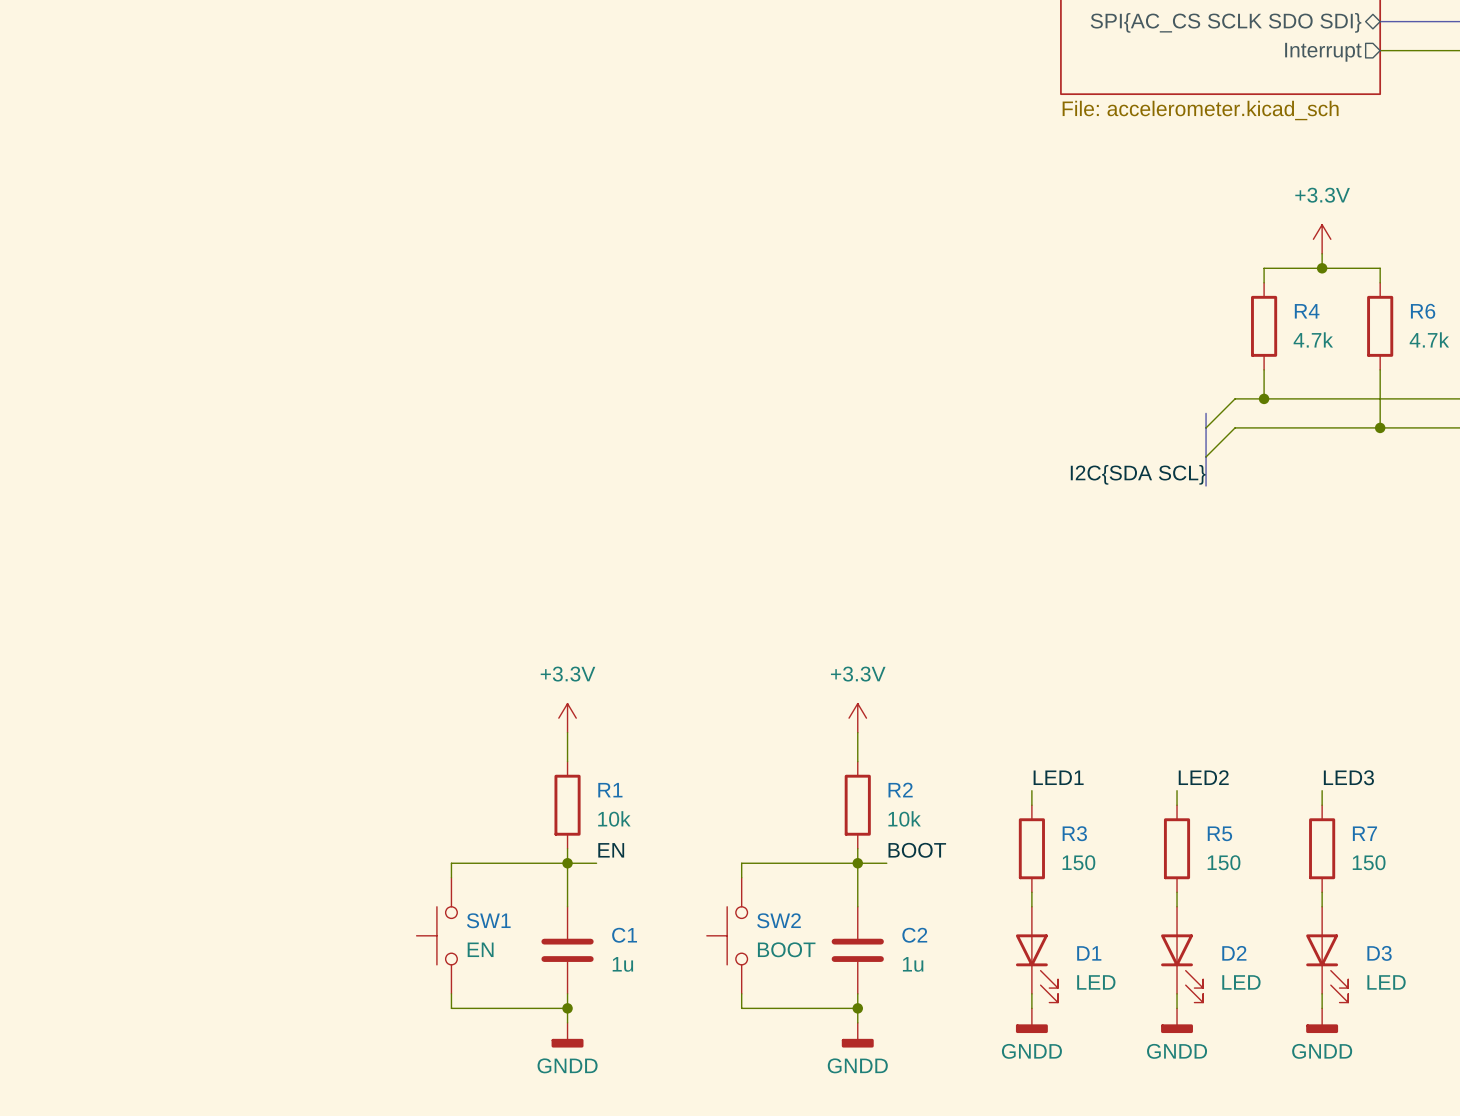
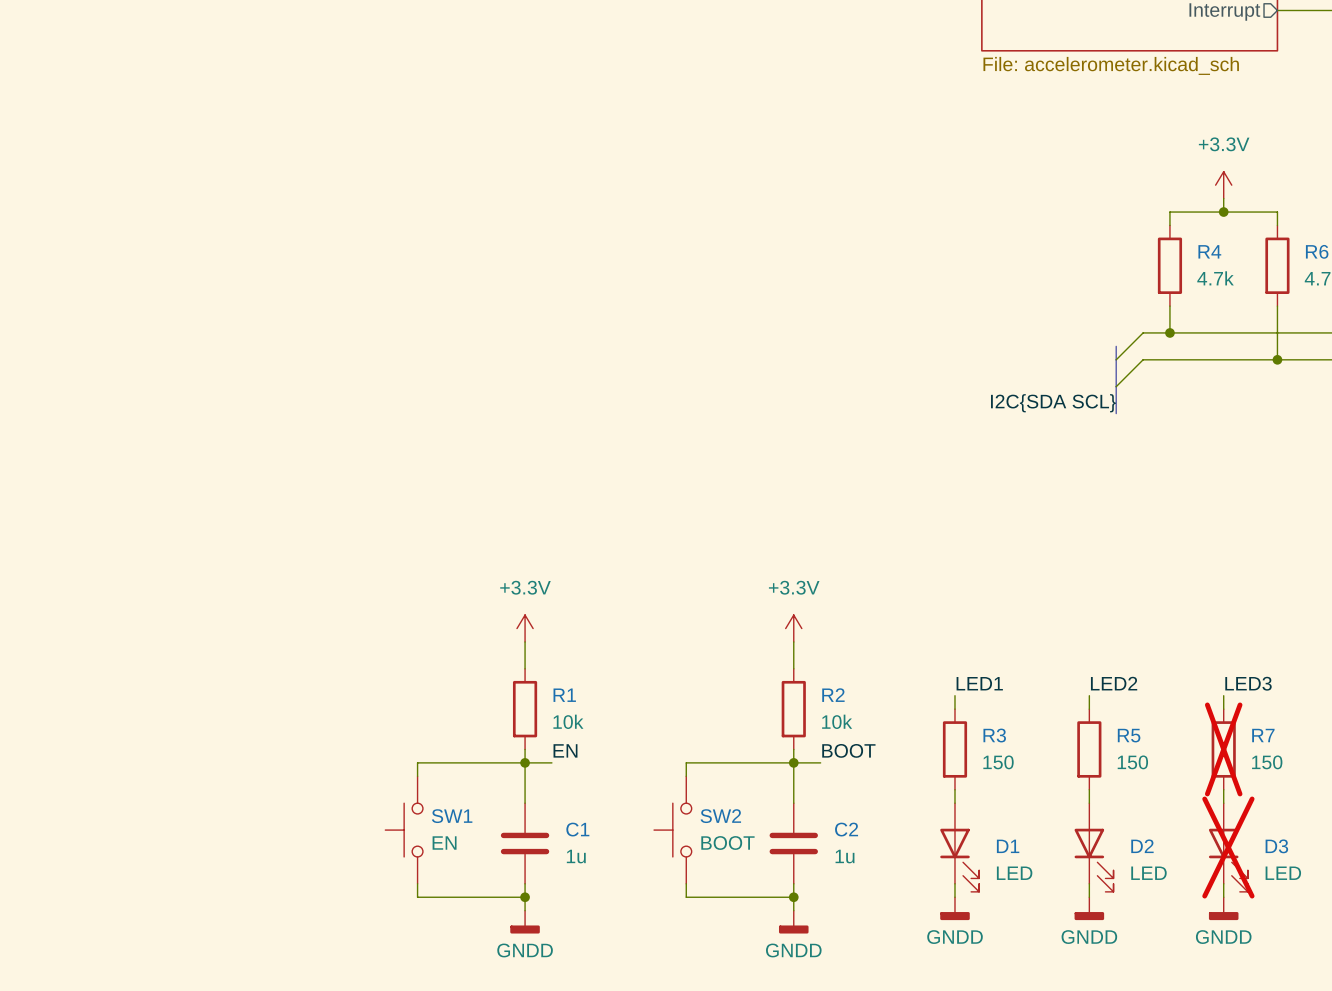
R7 do-not-place cross: none -> (1223, 749)
D3 do-not-place cross: none -> (1228, 847)

